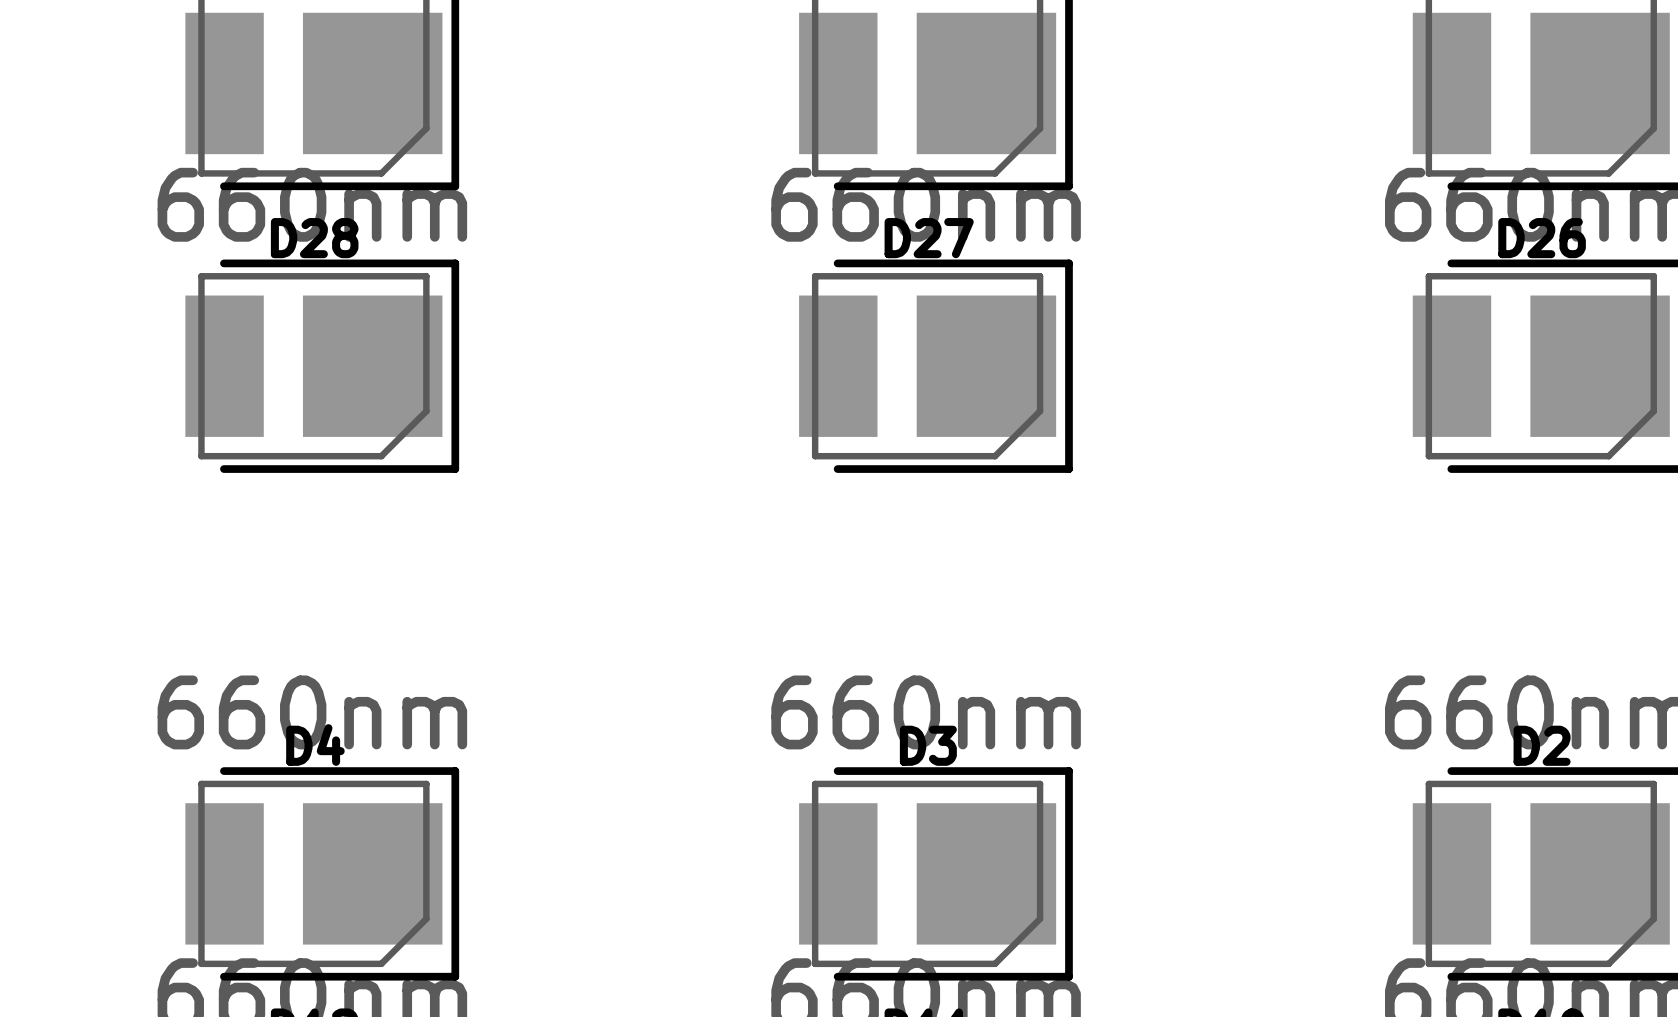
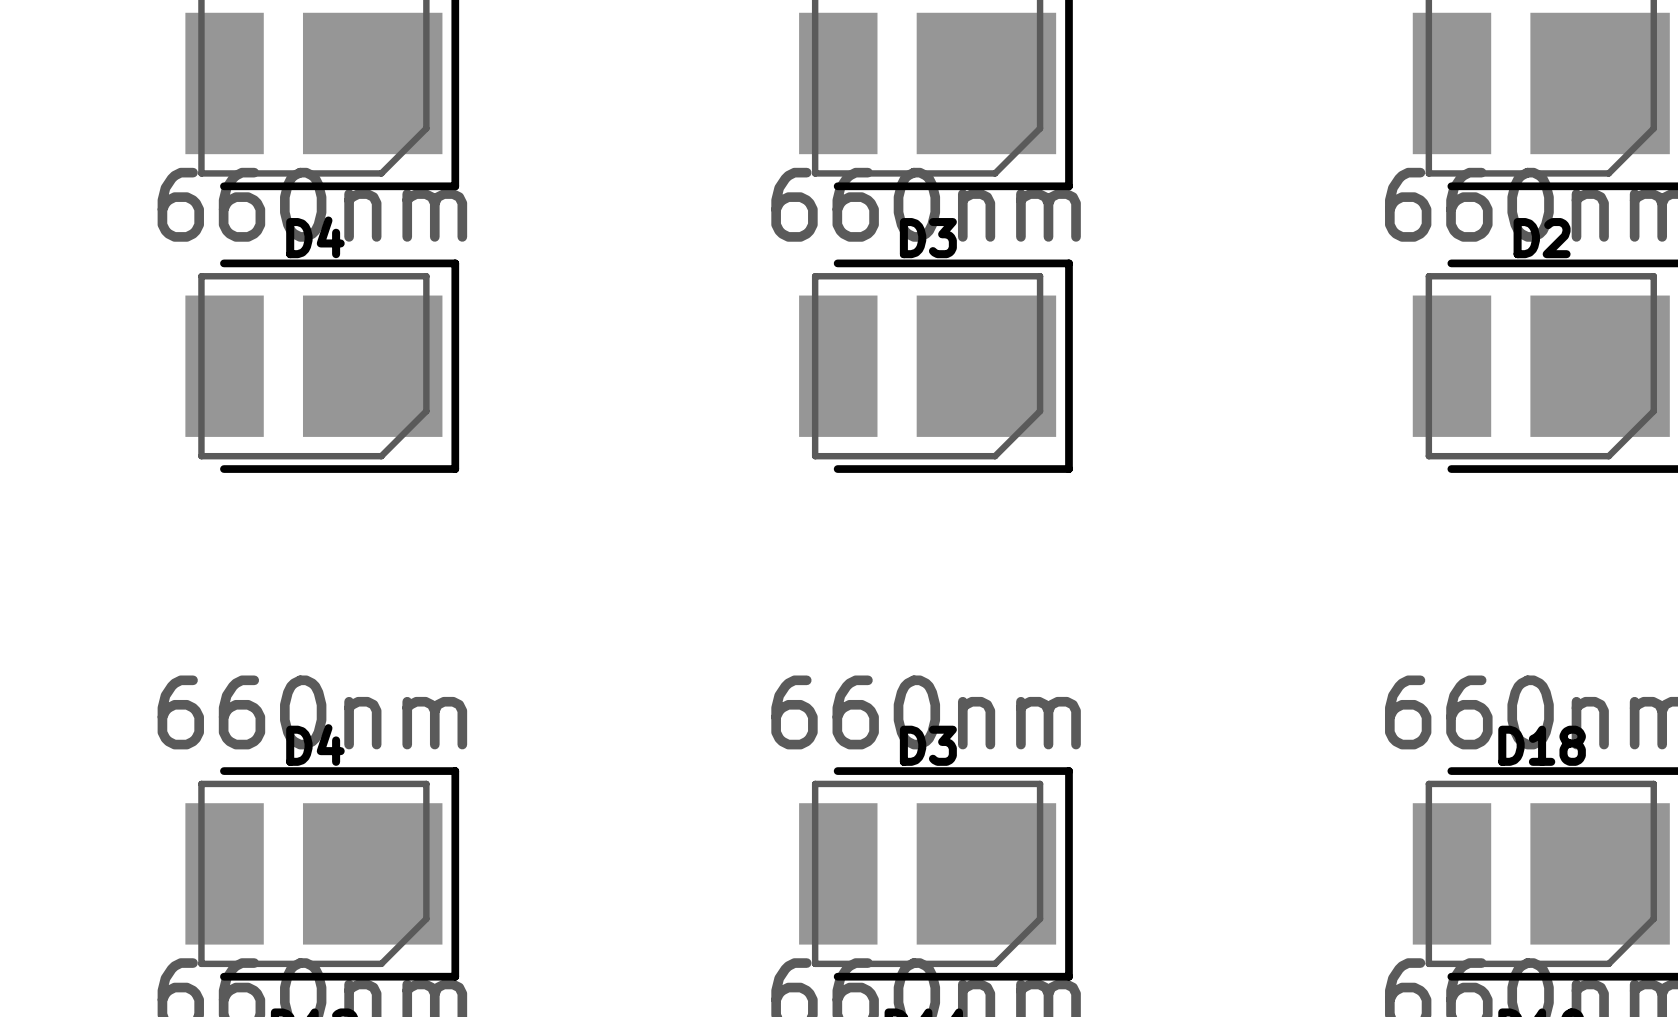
D28 name: D28 (314, 238) -> D4 (315, 237)
D27 name: D27 (929, 238) -> D3 (928, 238)
D26 name: D26 (1542, 238) -> D2 (1542, 238)
D2 name: D2 (1542, 745) -> D18 (1542, 745)

